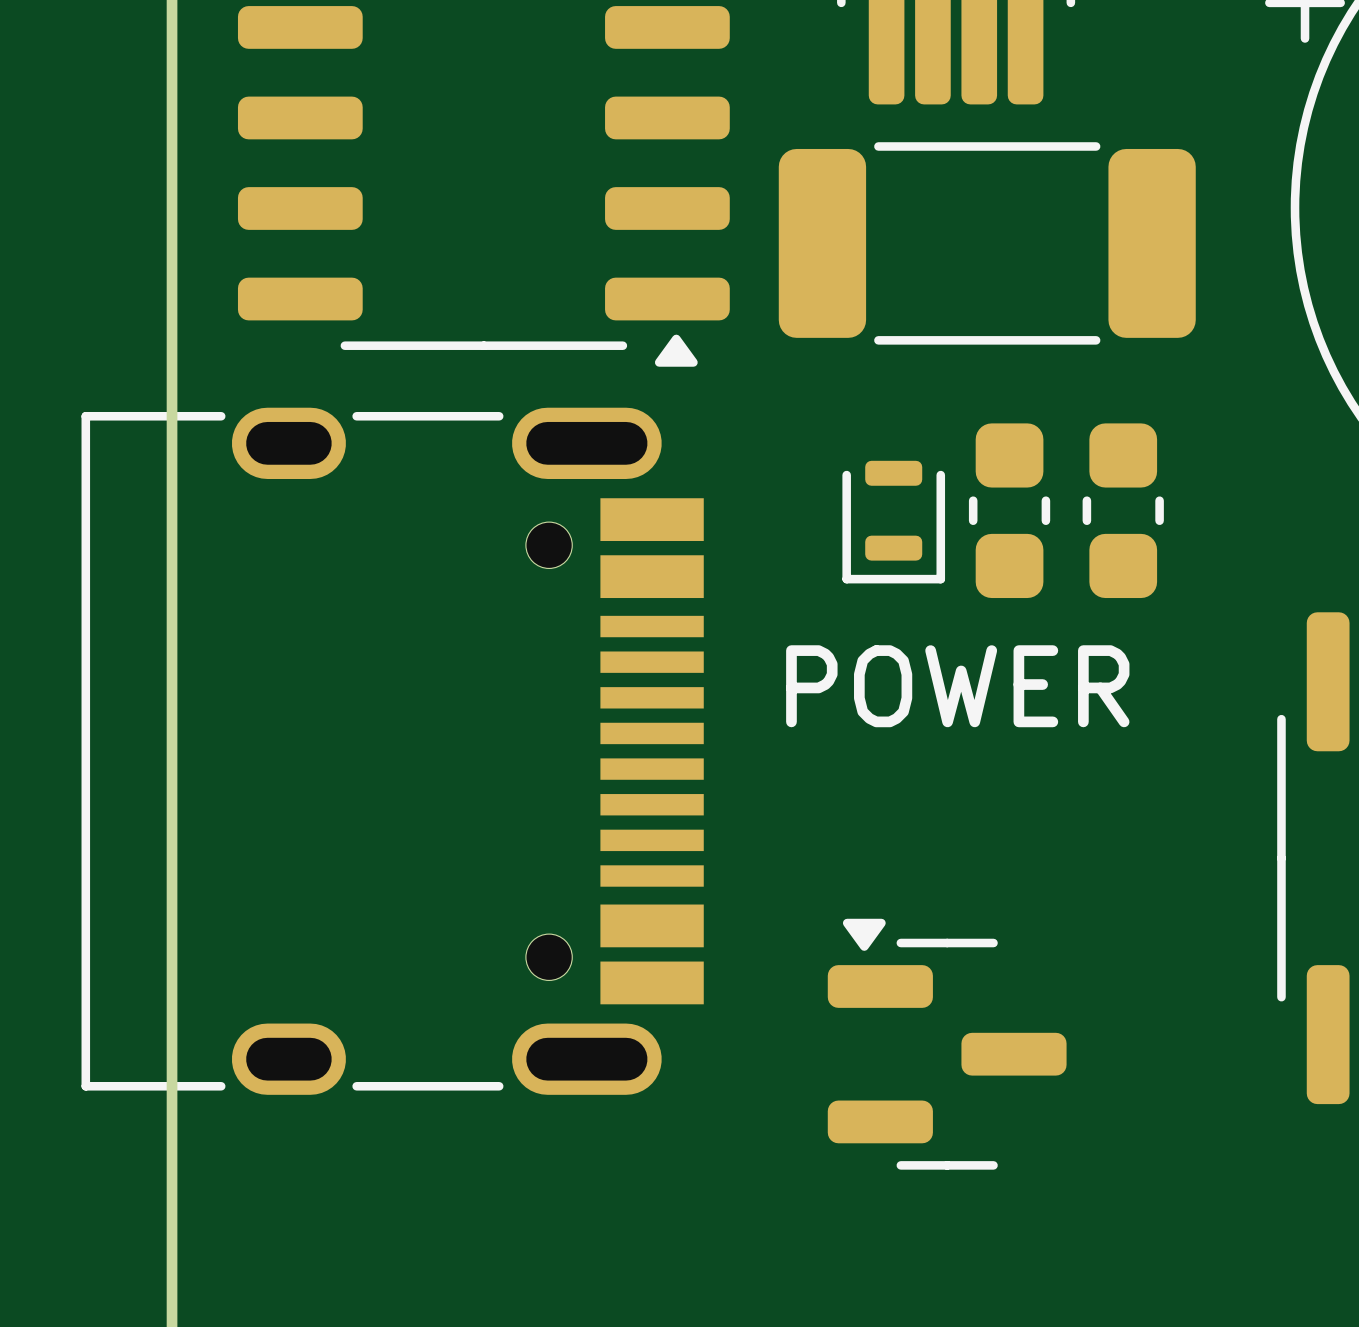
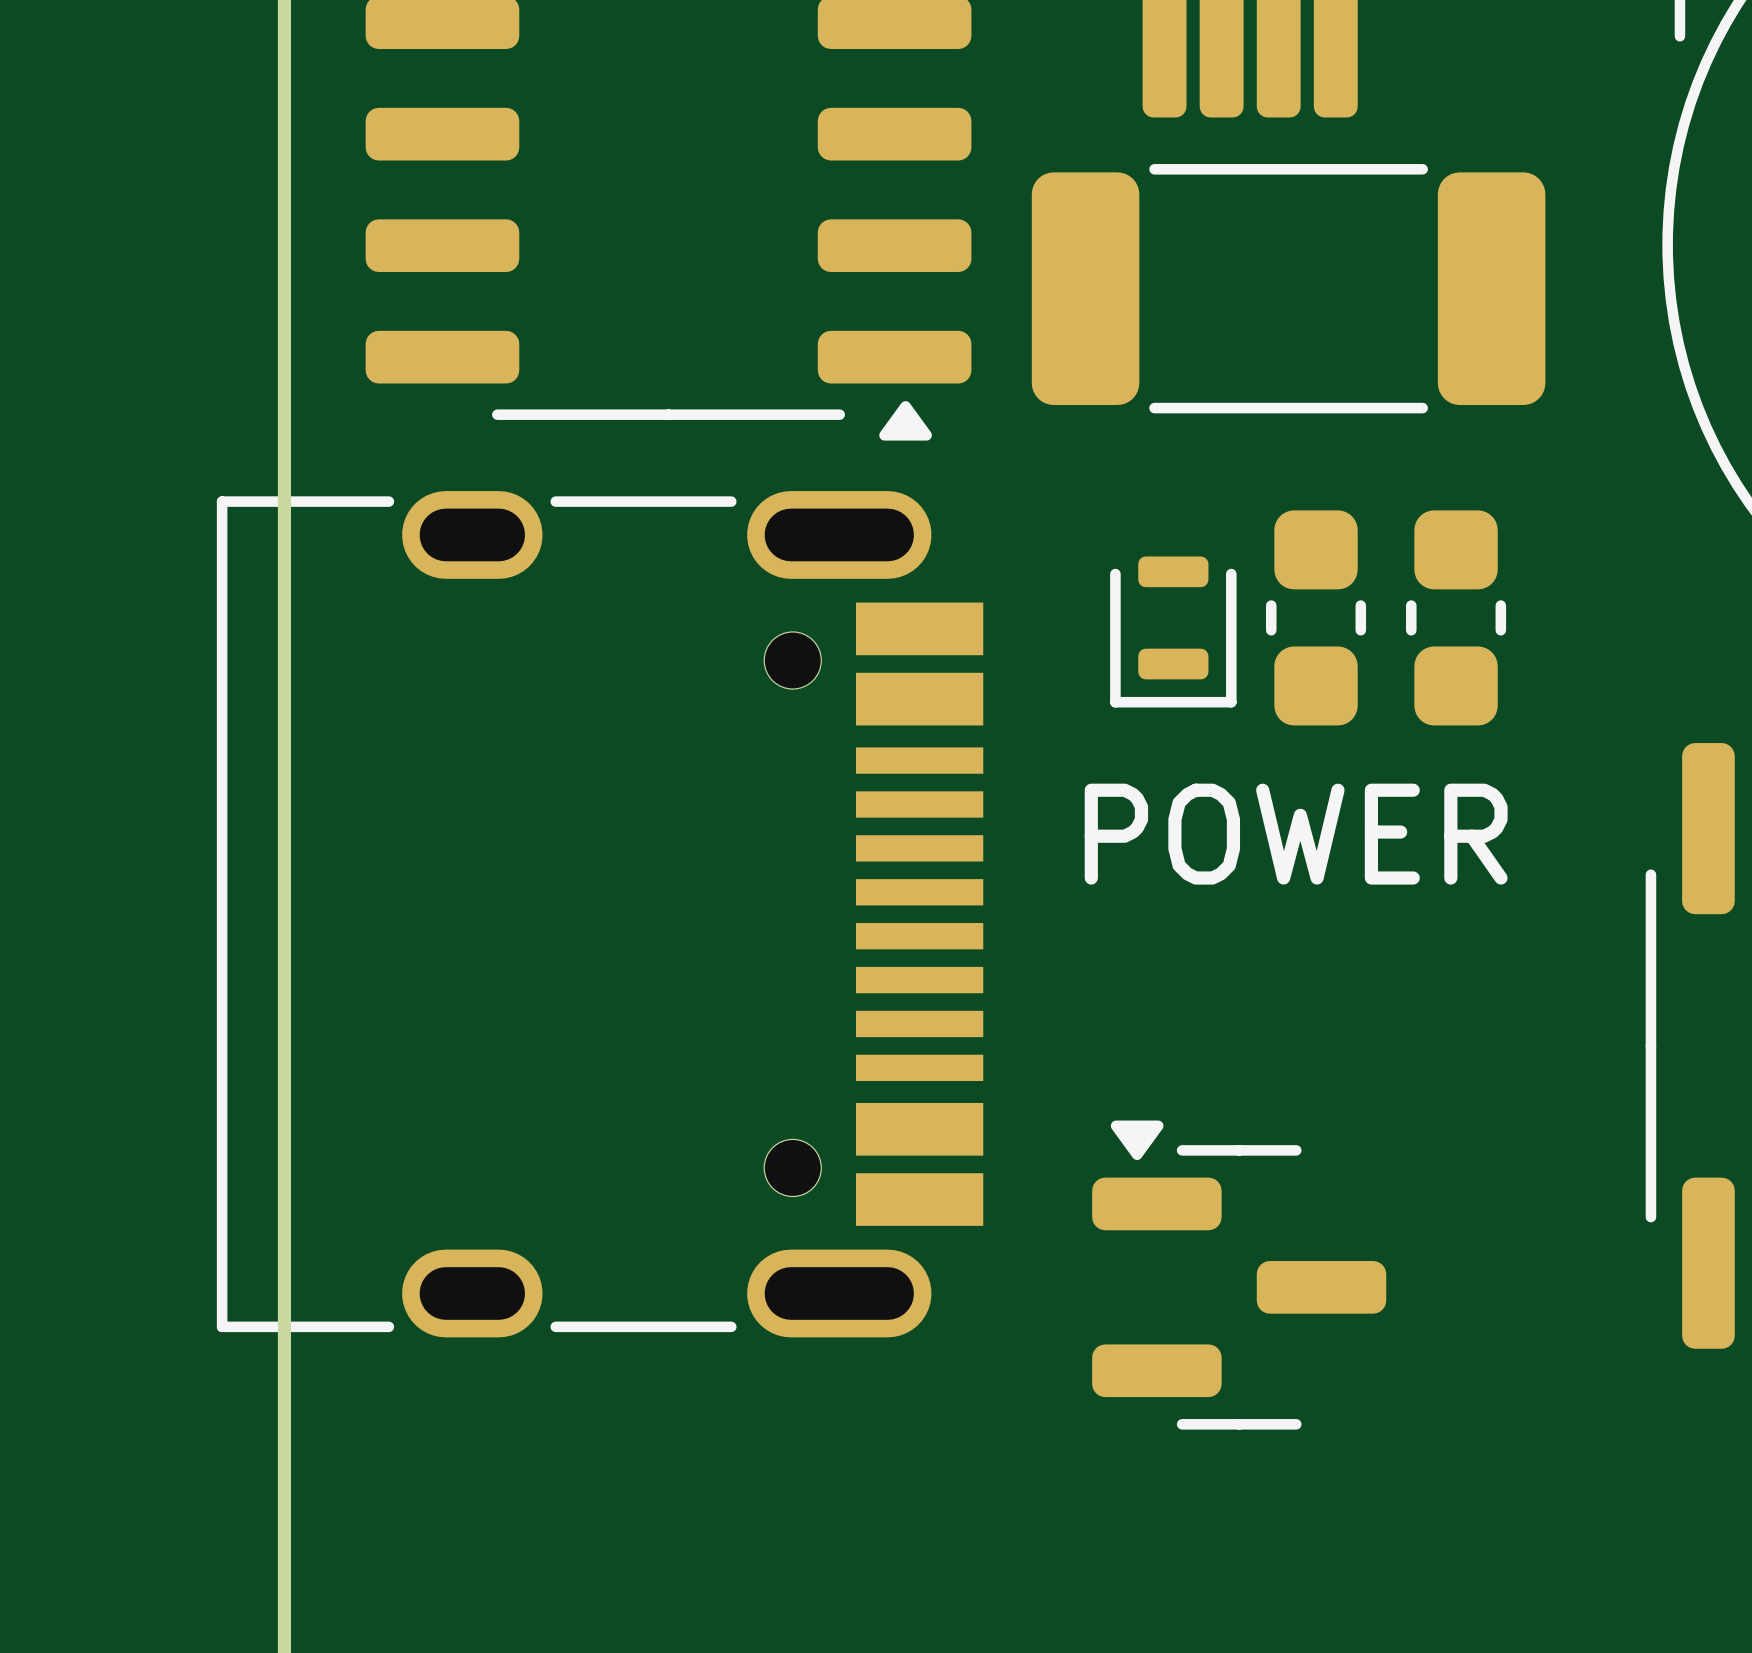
part position: (392, 751) -> (600, 914)

